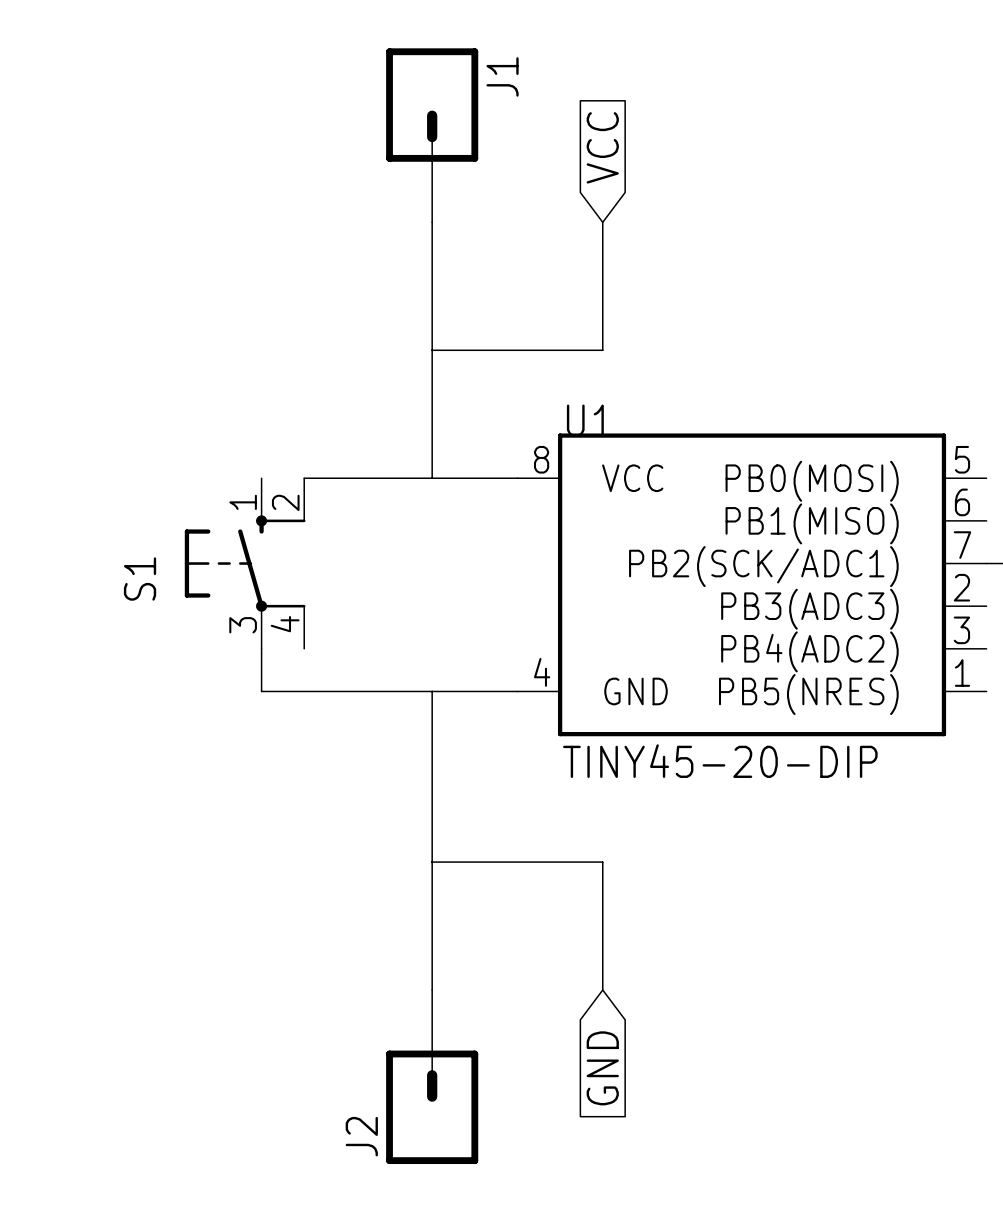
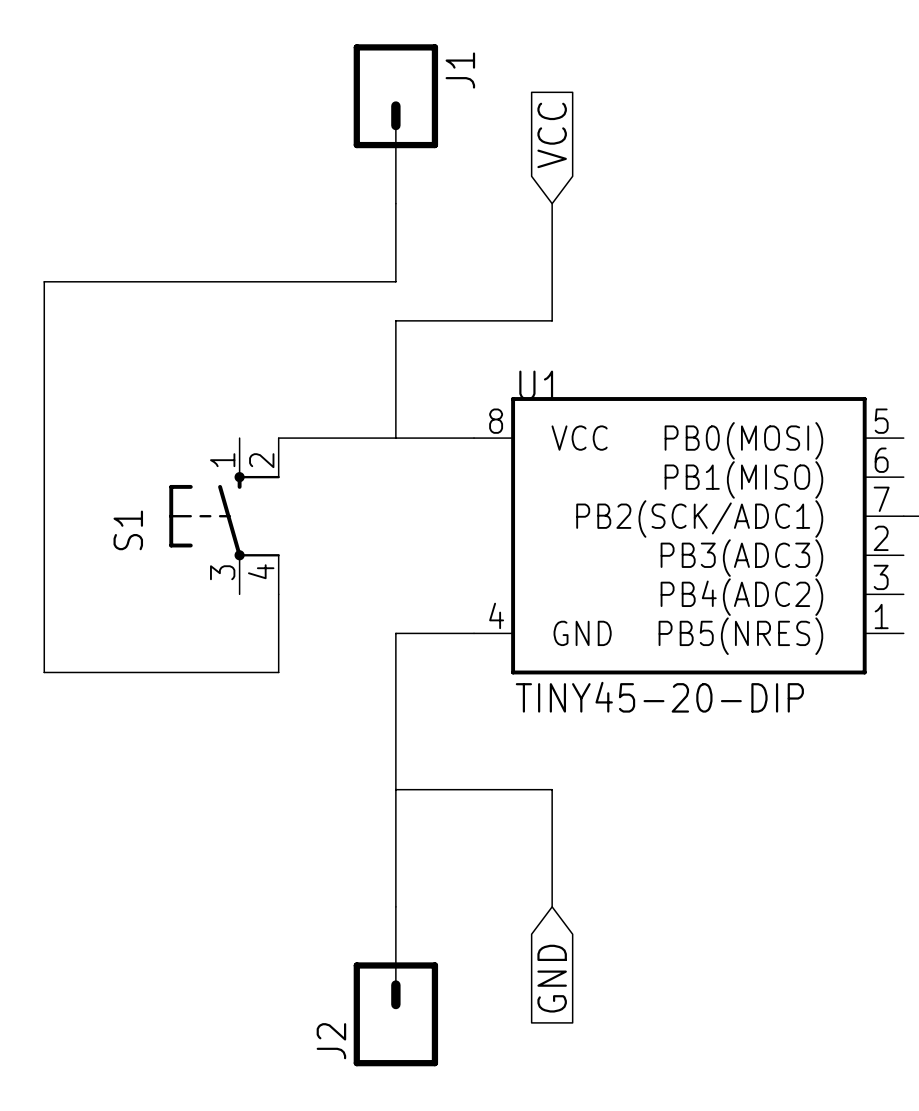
wire: (432, 307) (432, 350) -> (395, 281) (44, 281) (44, 672) (278, 672) (278, 594)
wire: (261, 648) (261, 691) (432, 691) -> none

